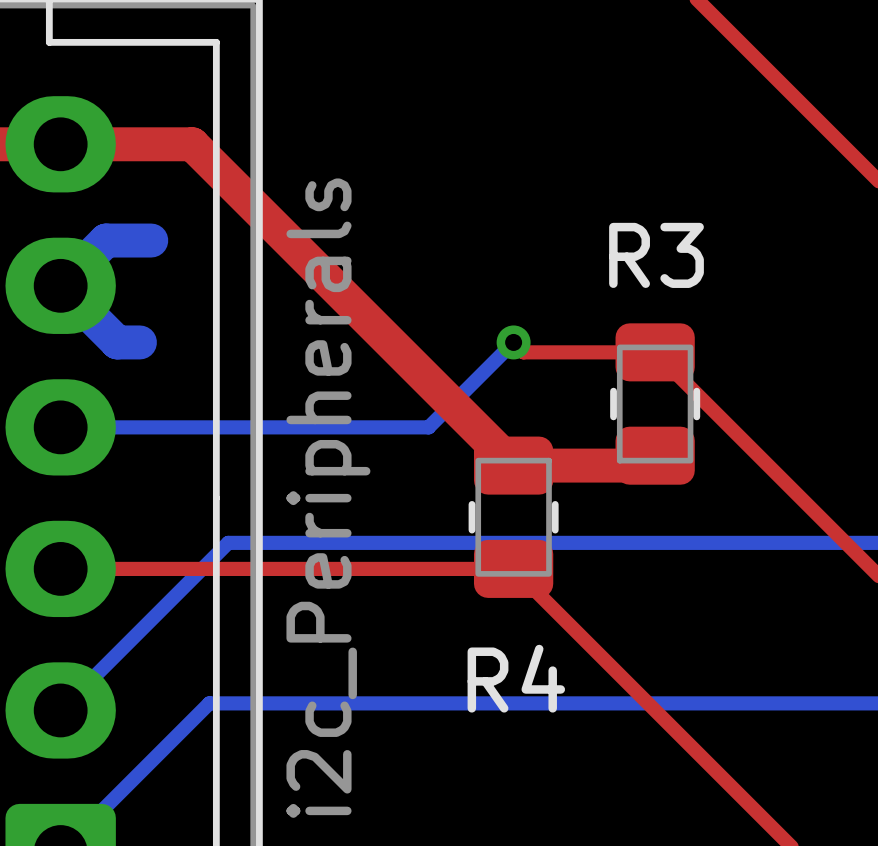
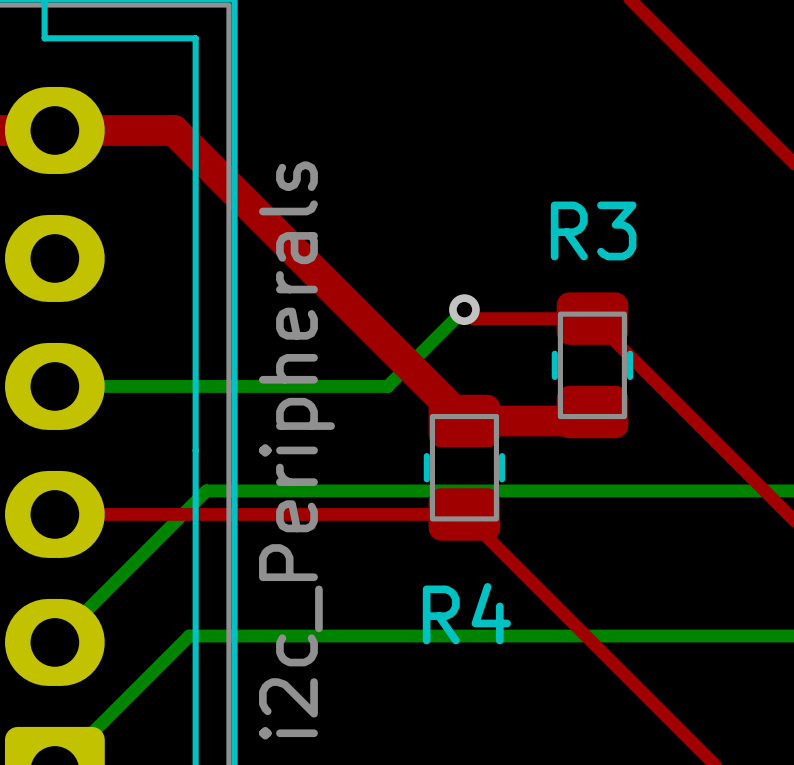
bottom track: (151, 240) (105, 240) (60, 285) (117, 342) (139, 342) -> none

